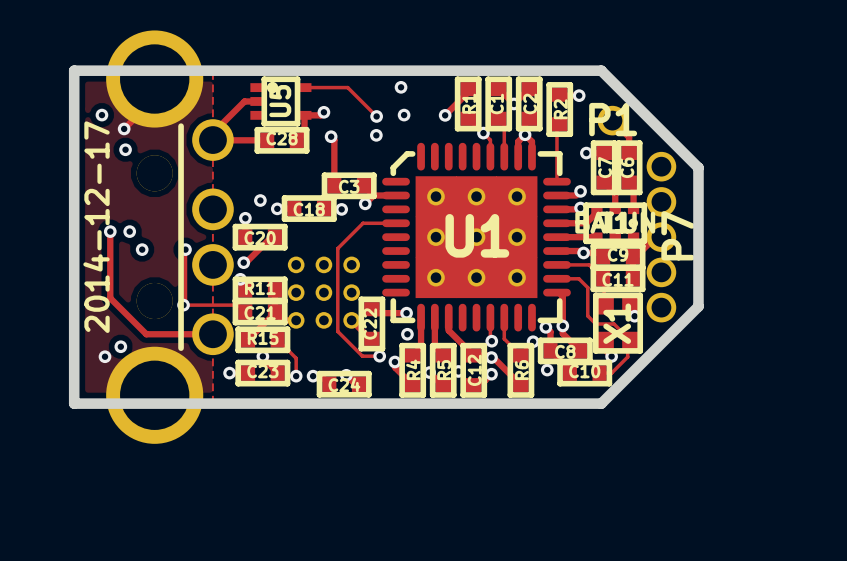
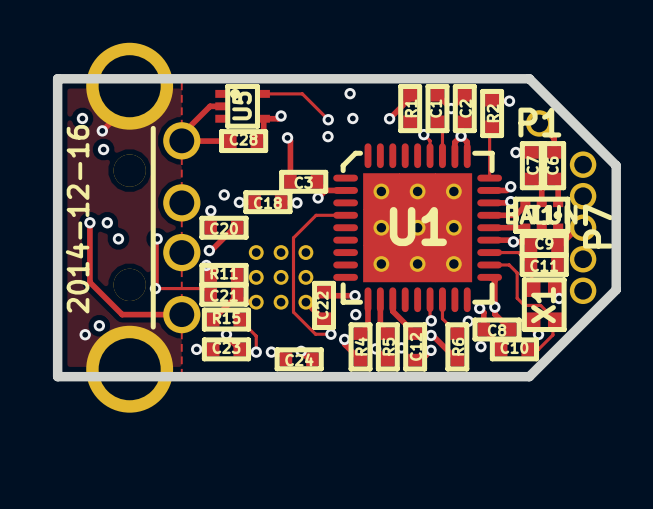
text: 2014-12-17 (96, 227) -> 2014-12-16 (77, 219)

